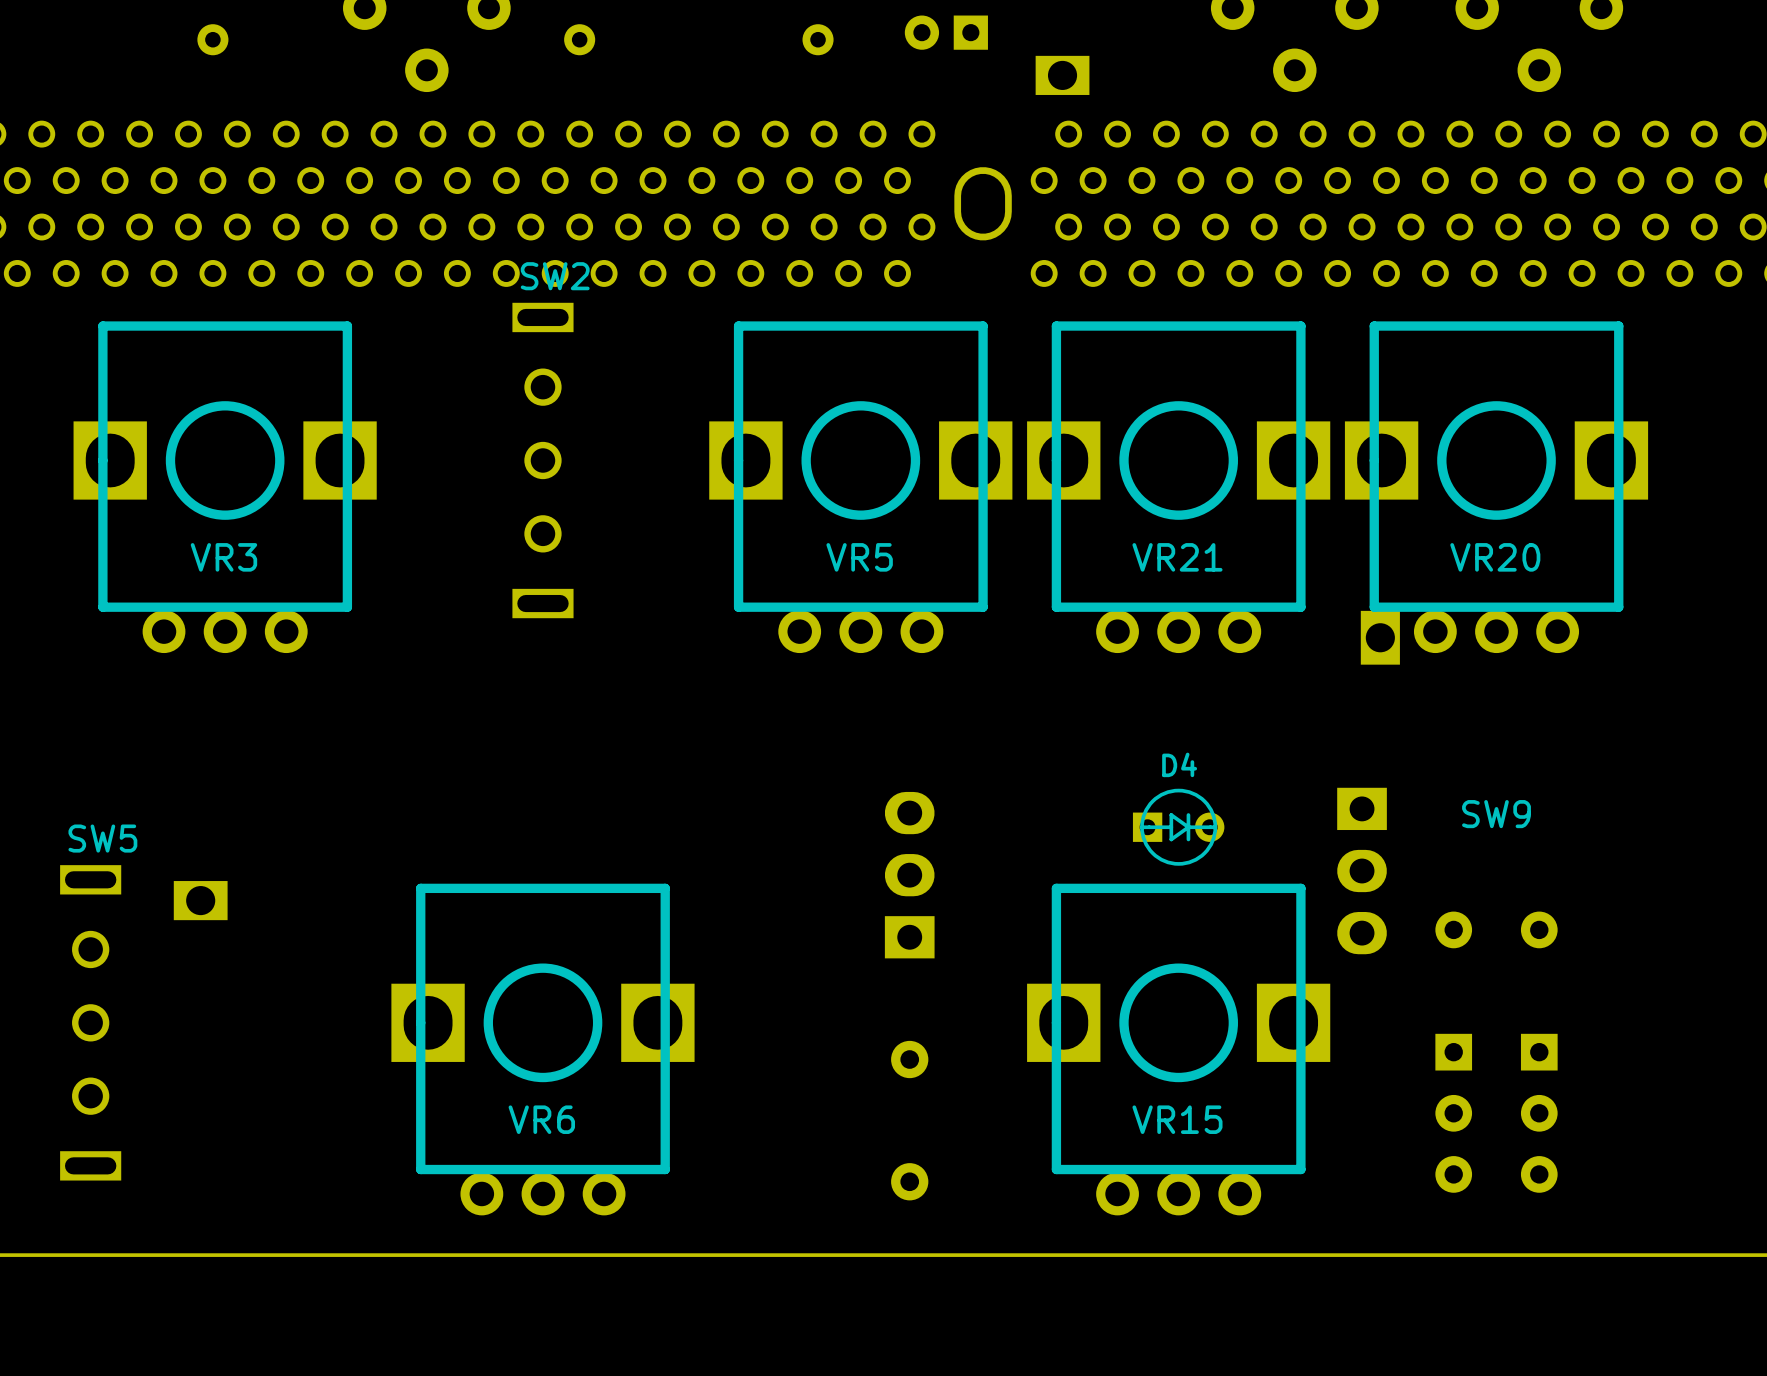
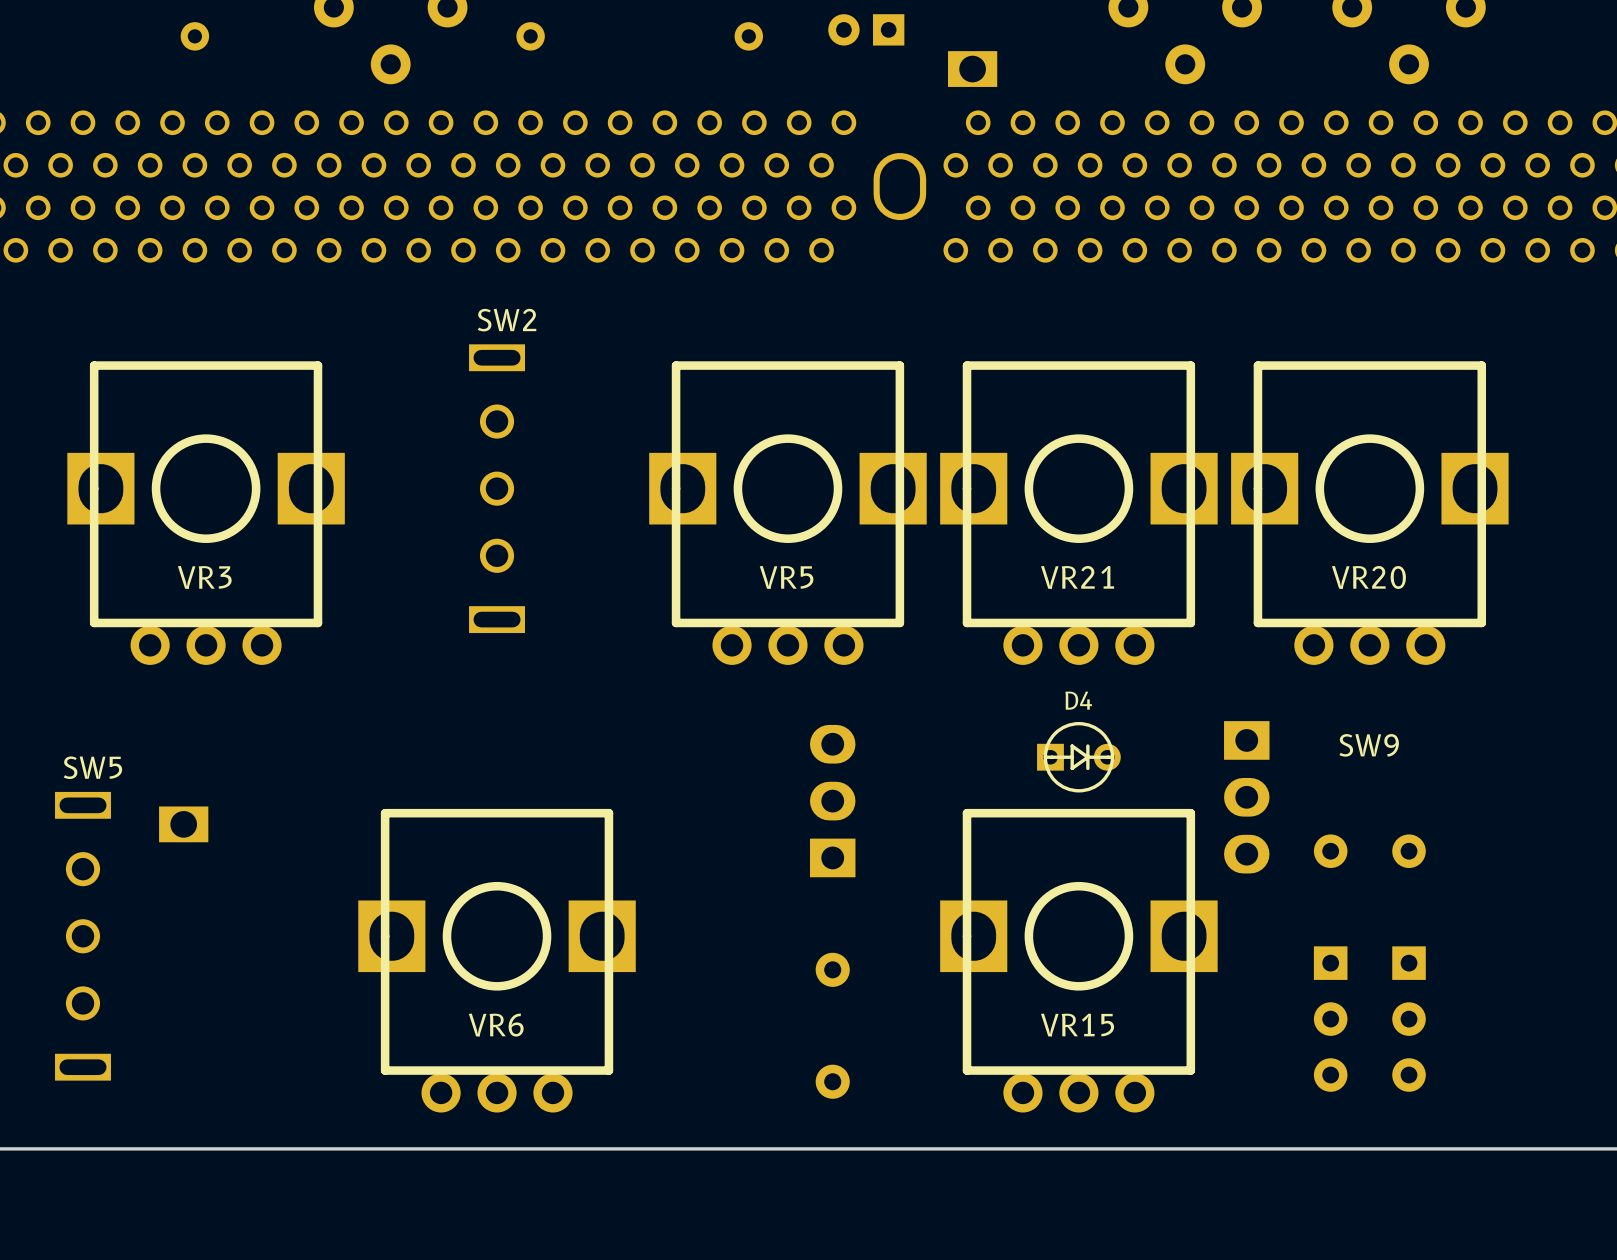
SW2 position: (542, 460) -> (497, 488)
VR3 position: (225, 487) -> (206, 513)
VR5 position: (860, 487) -> (787, 513)
VR21 position: (1178, 487) -> (1078, 513)
VR20 position: (1496, 487) -> (1369, 513)
part: (1380, 637) -> none

